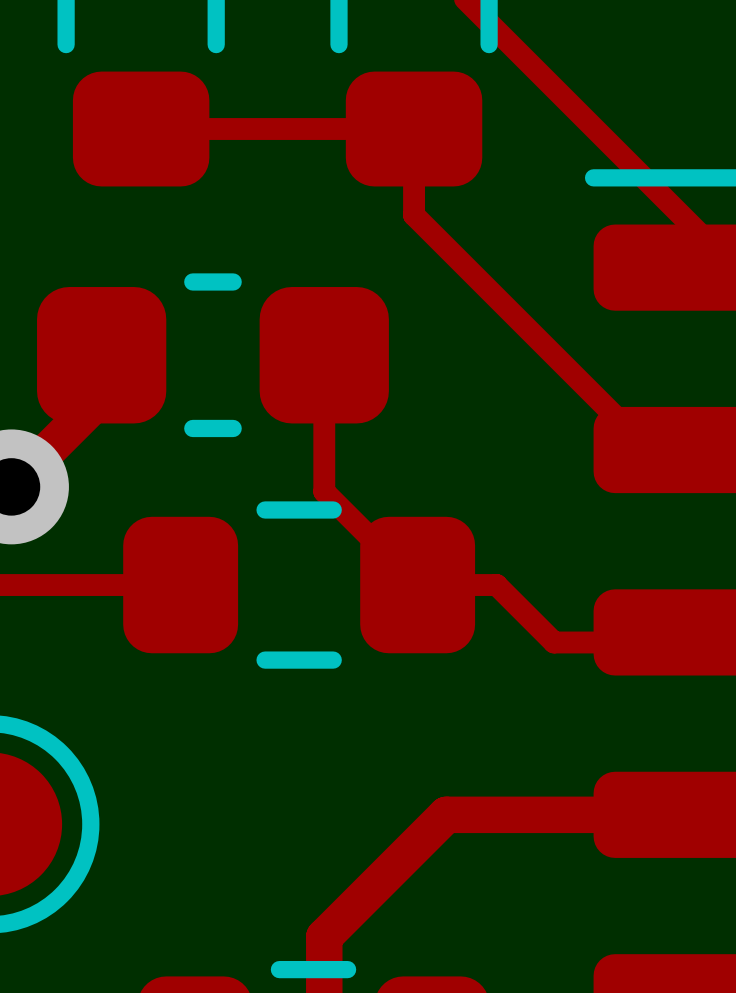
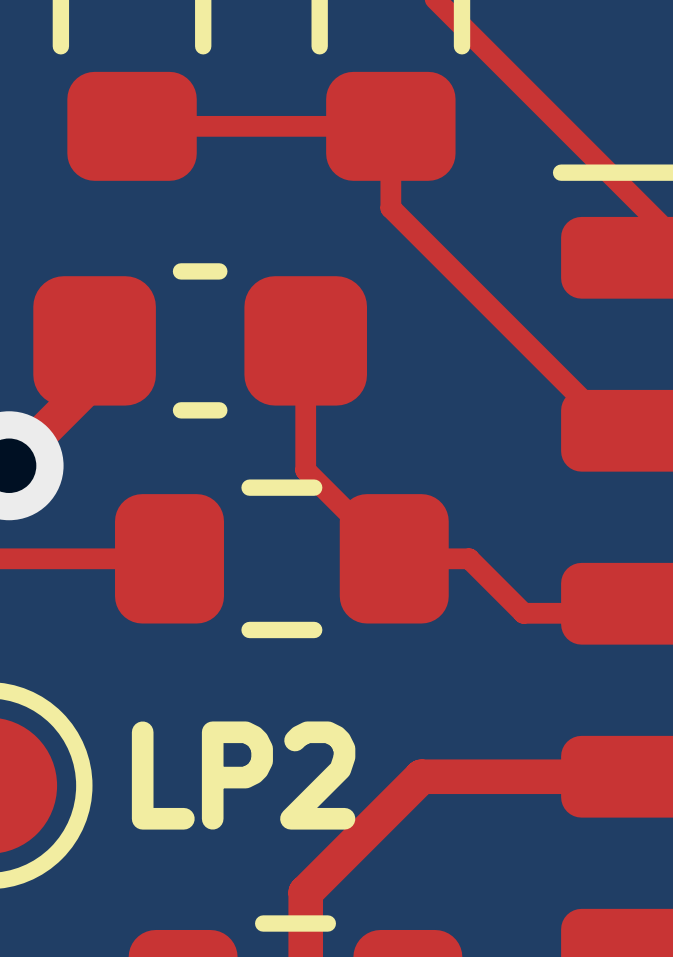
text: none -> LP2 (243, 775)

